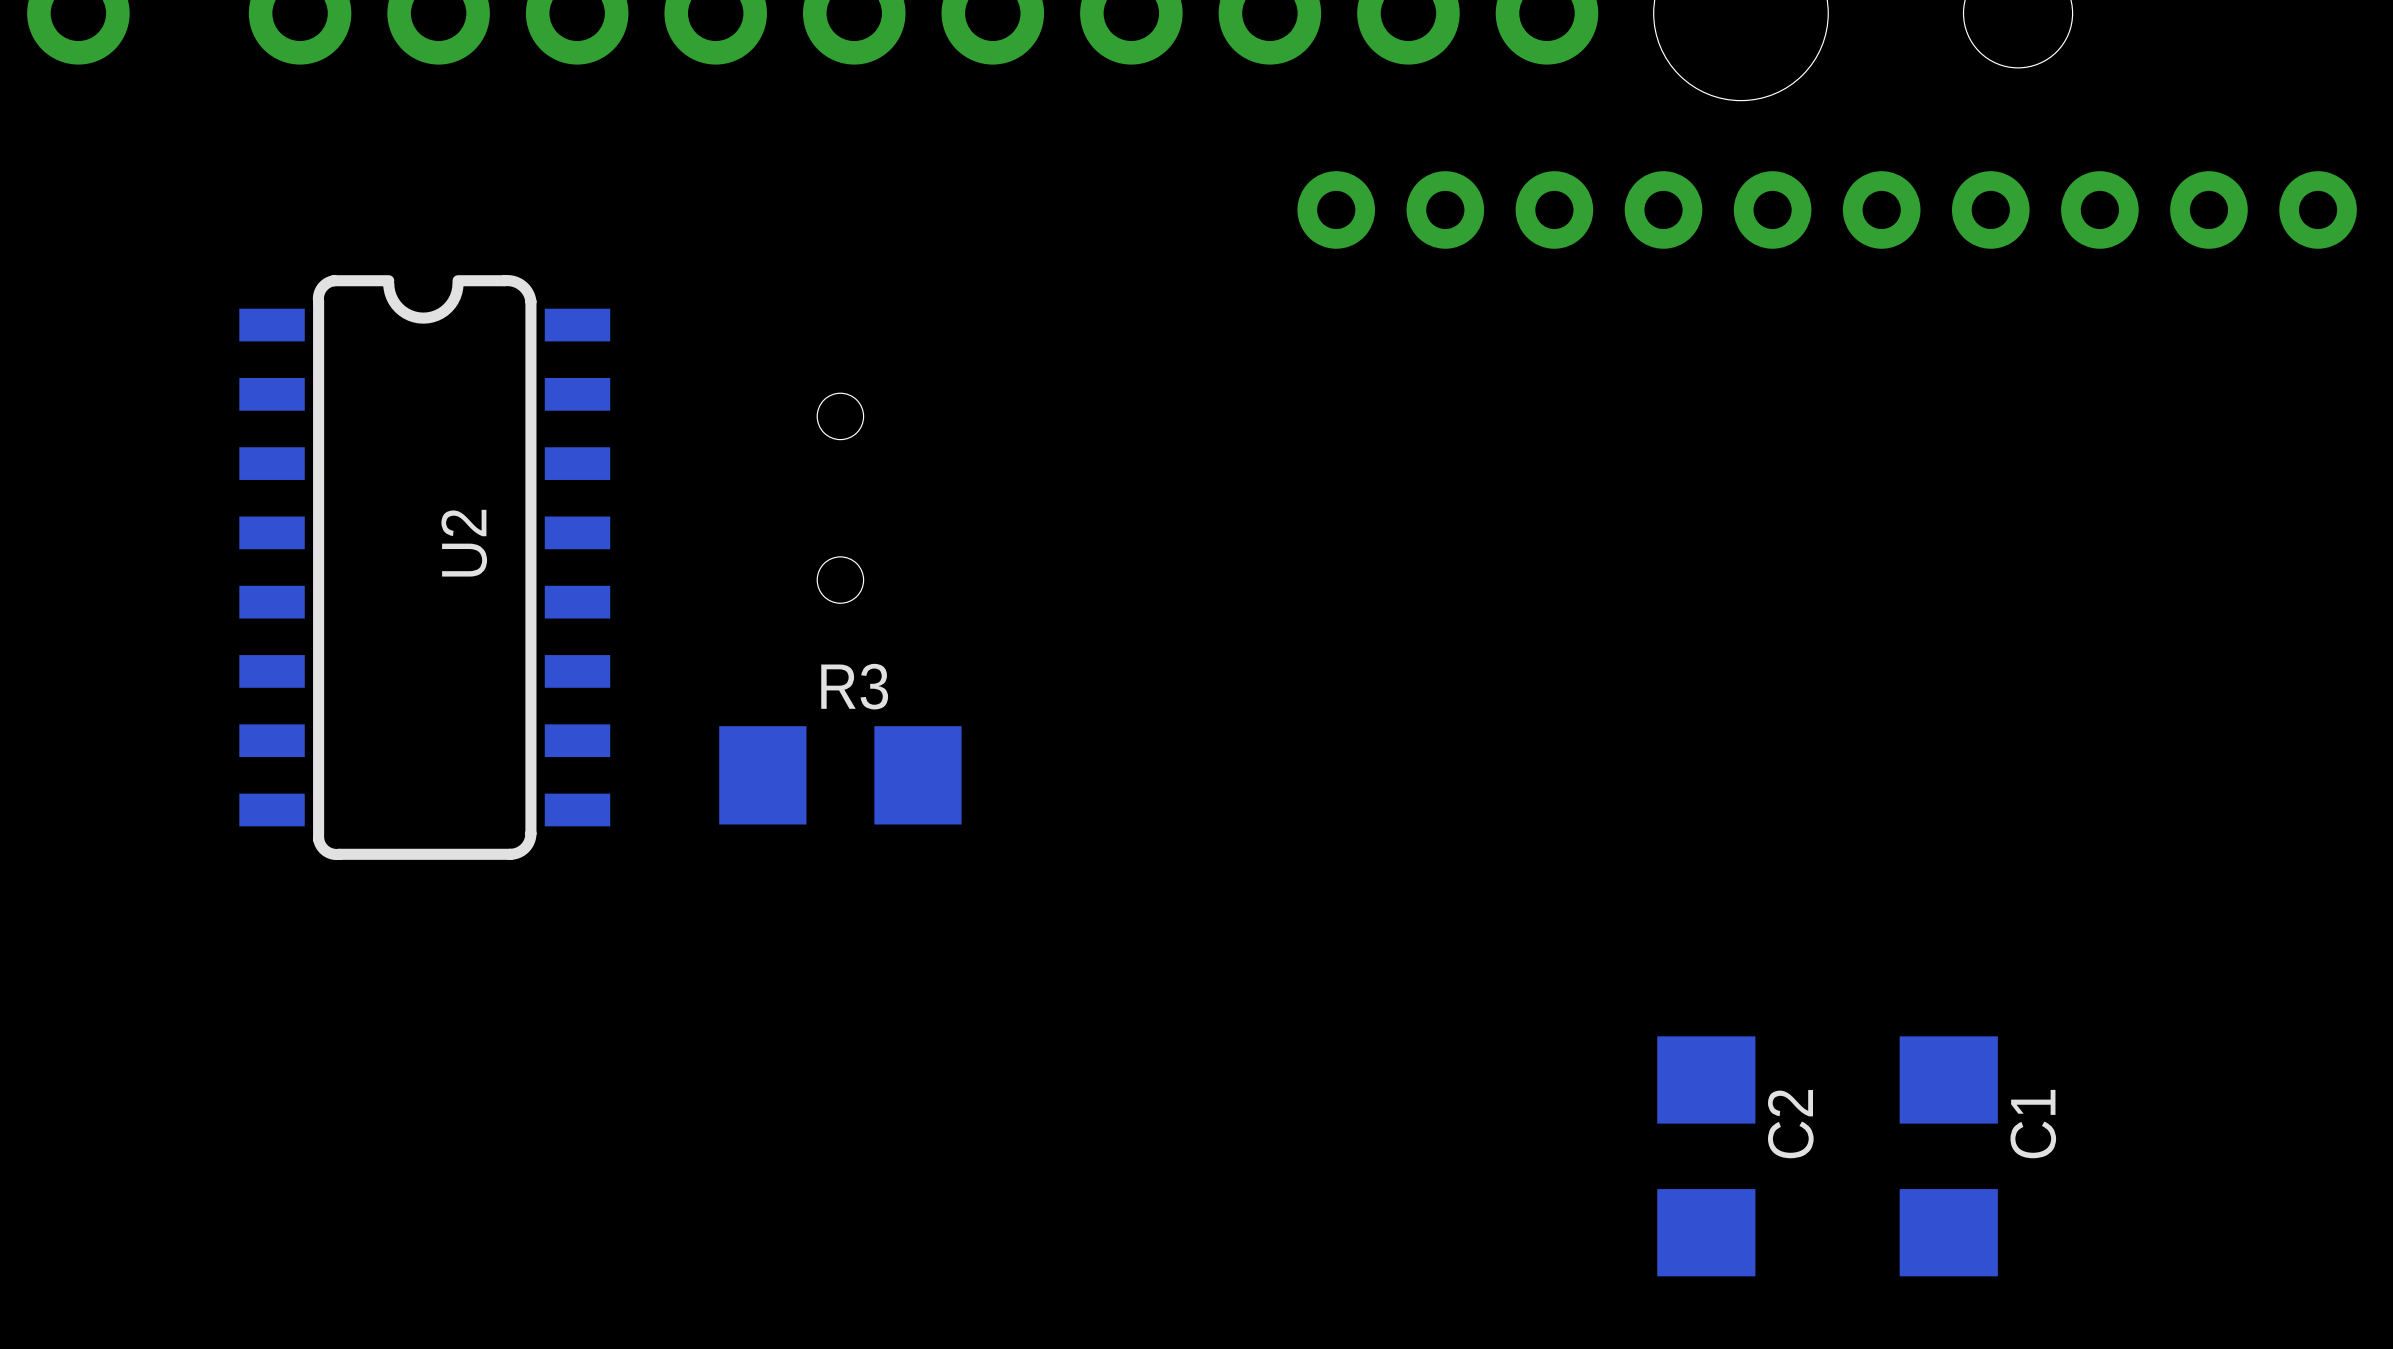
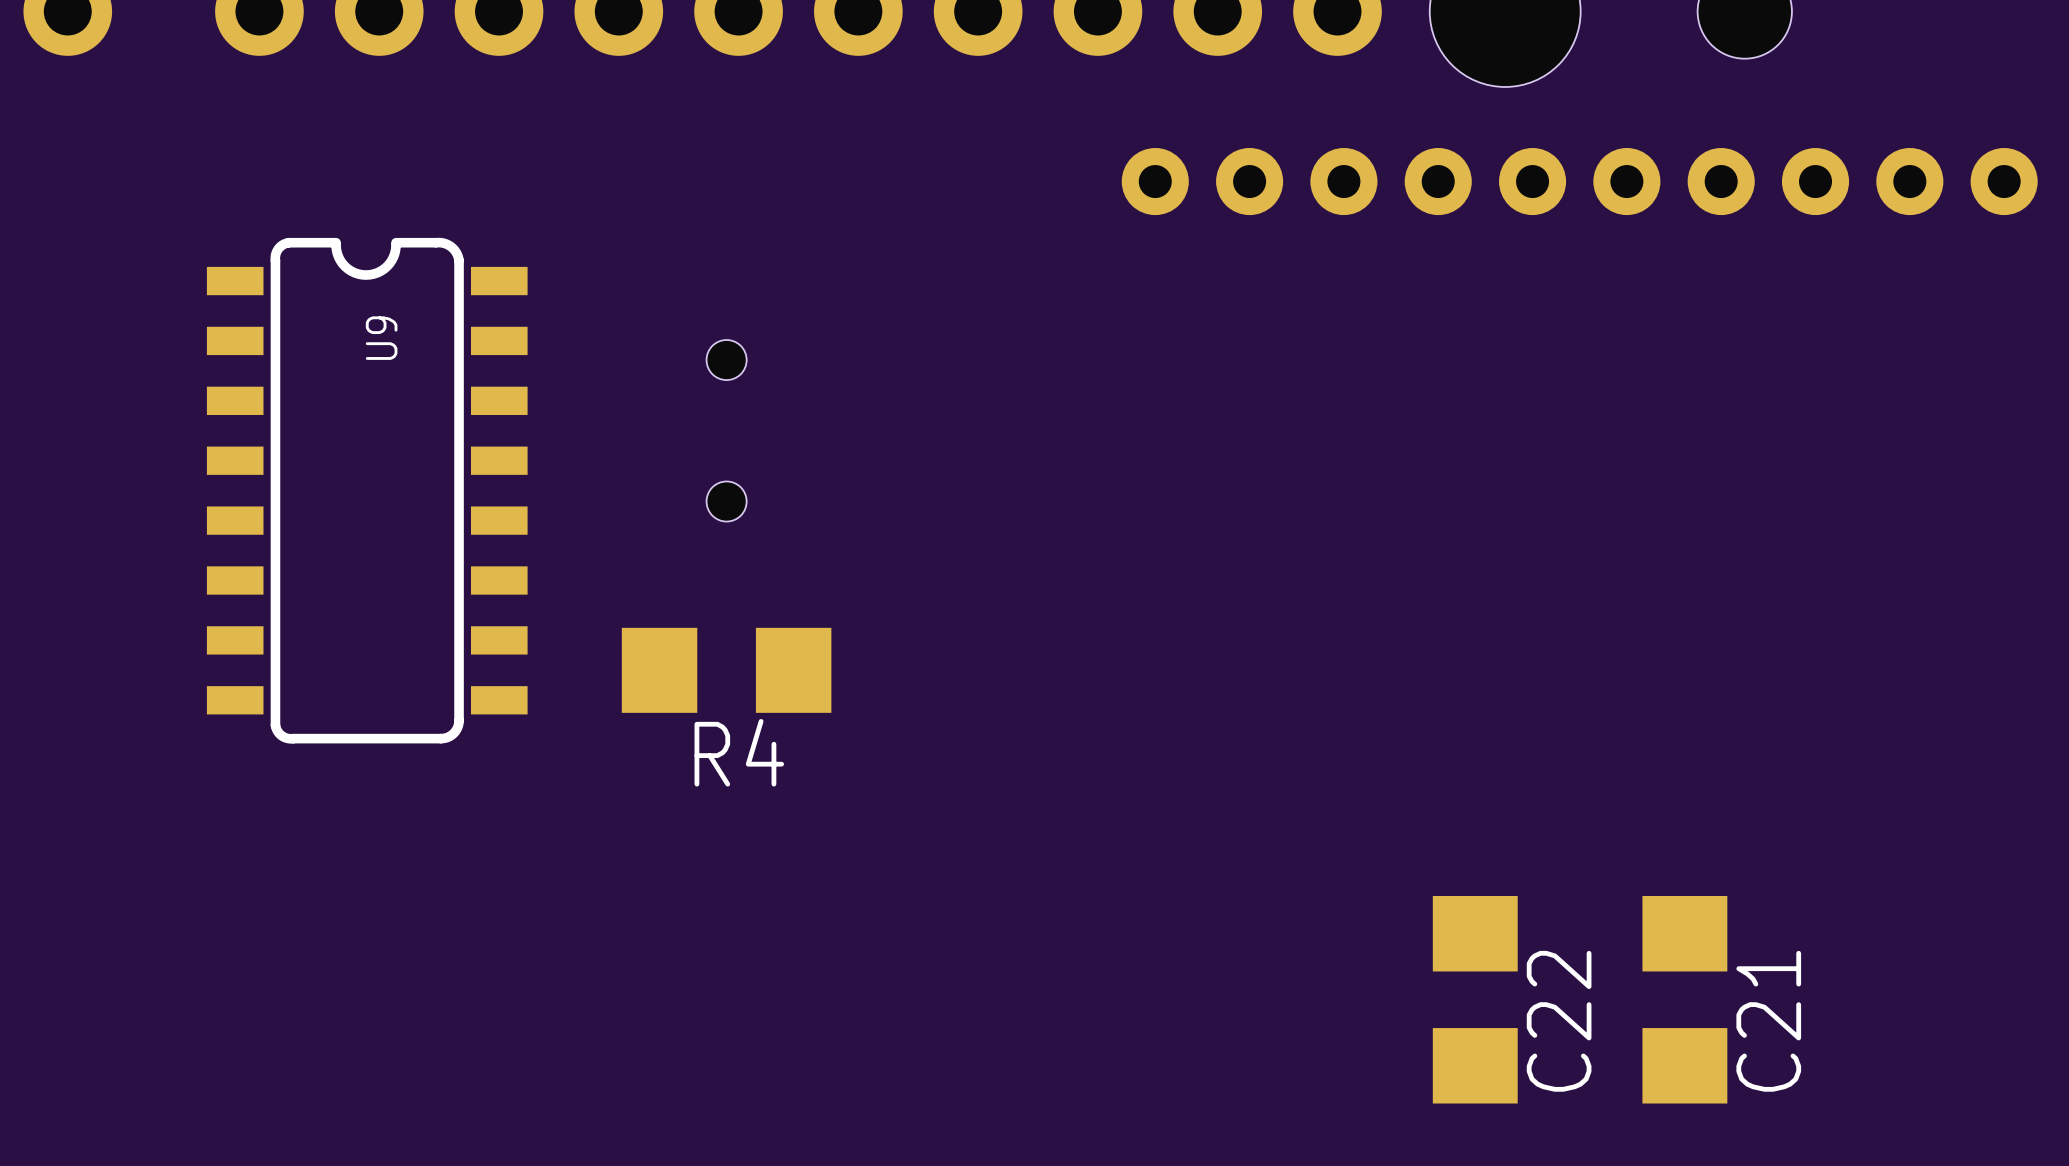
U2 name: U2 (464, 543) -> U9 (381, 338)
R3 name: R3 (854, 686) -> R4 (739, 752)
C2 name: C2 (1790, 1124) -> C22 (1559, 1021)
C1 name: C1 (2033, 1124) -> C21 (1768, 1021)

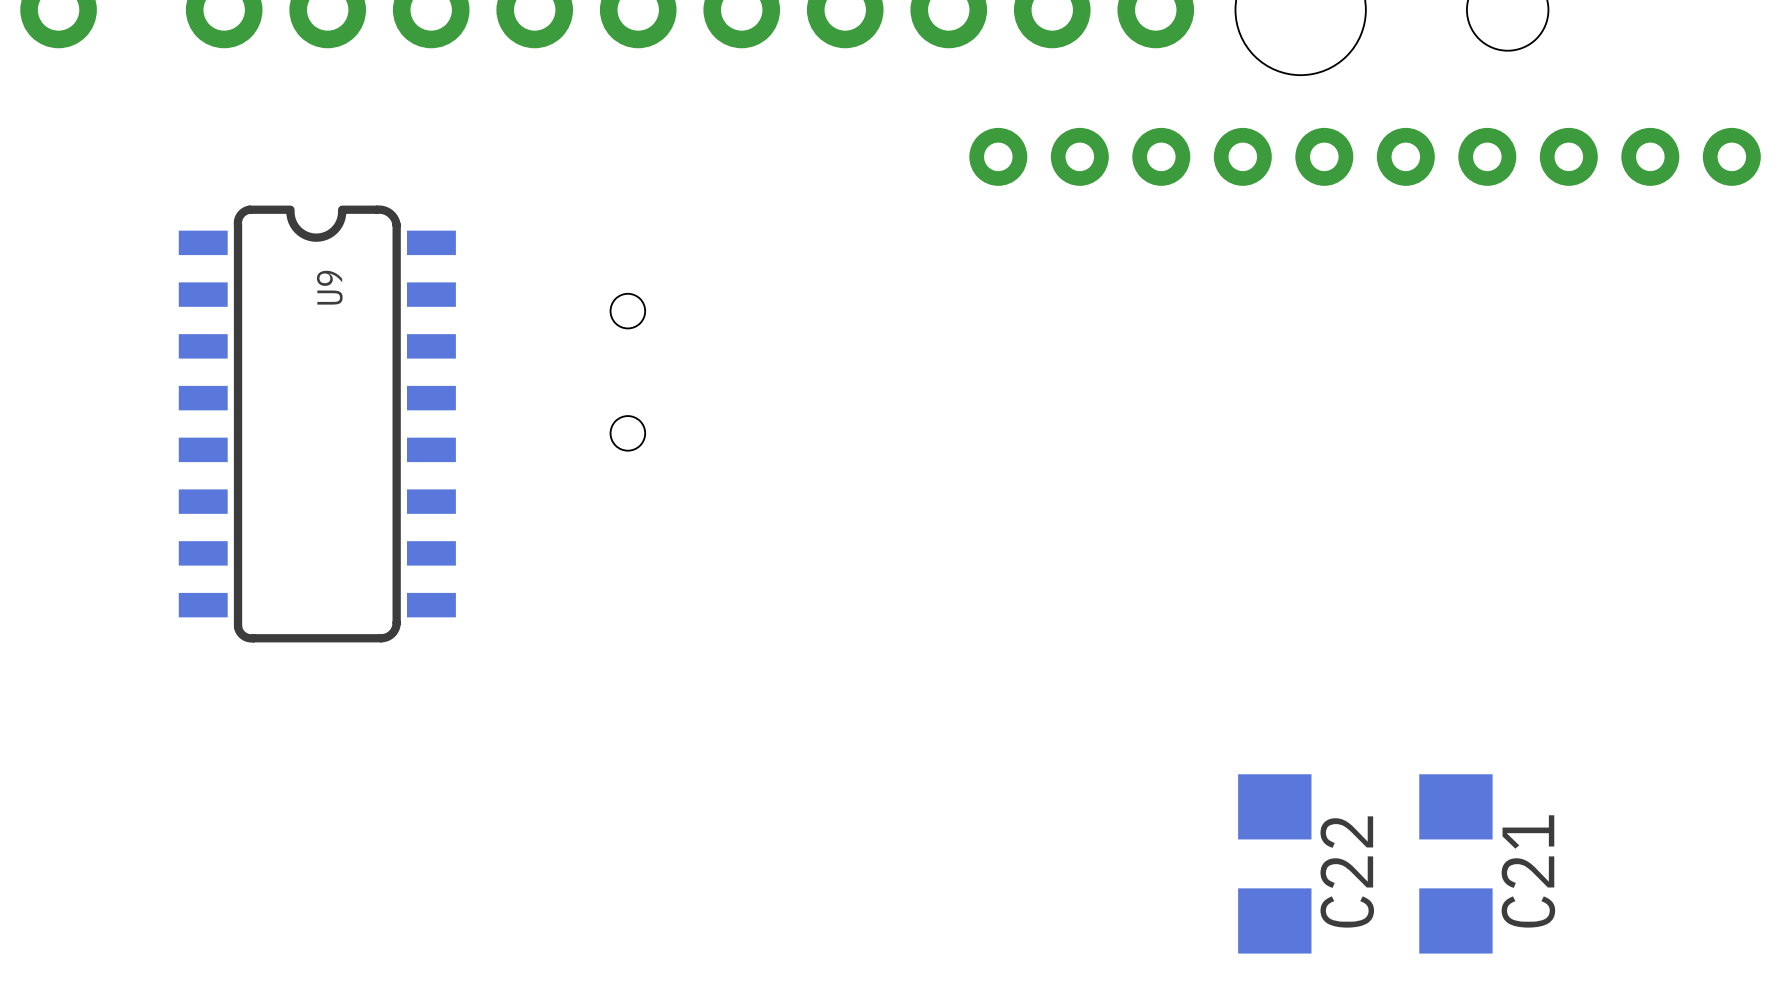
R4: (726, 670) -> none

